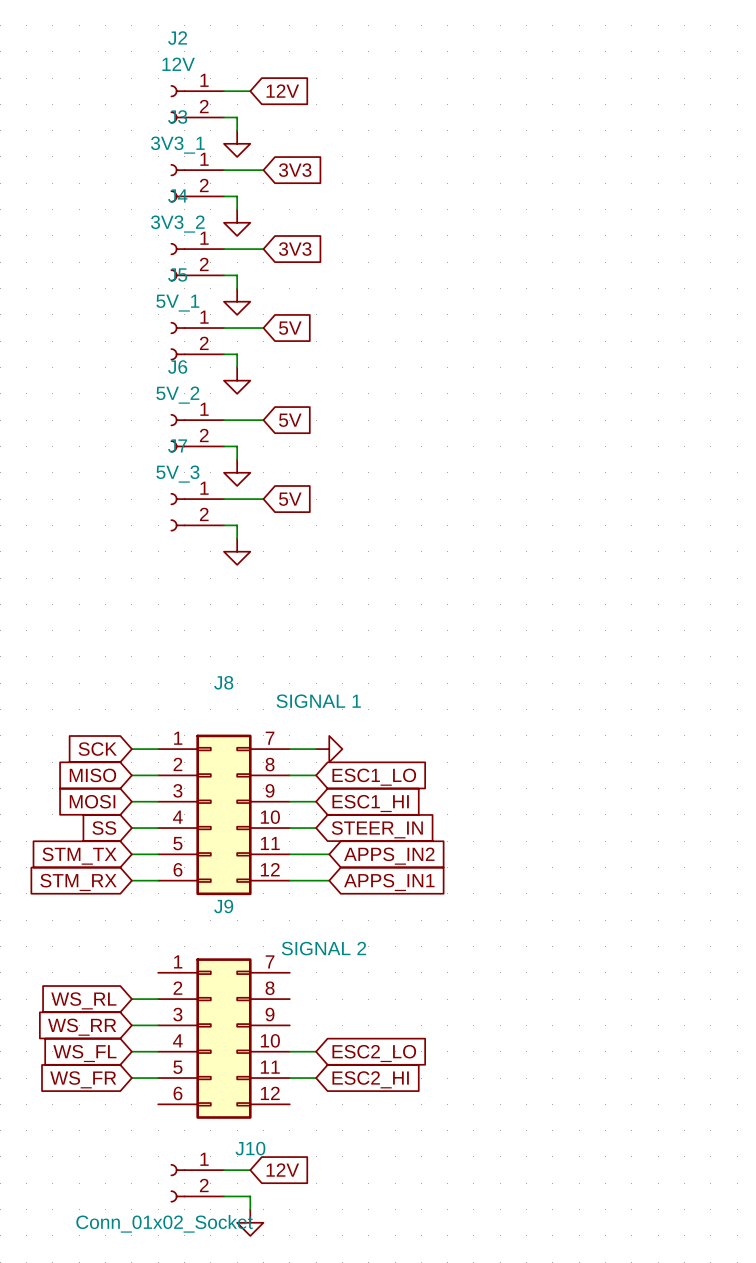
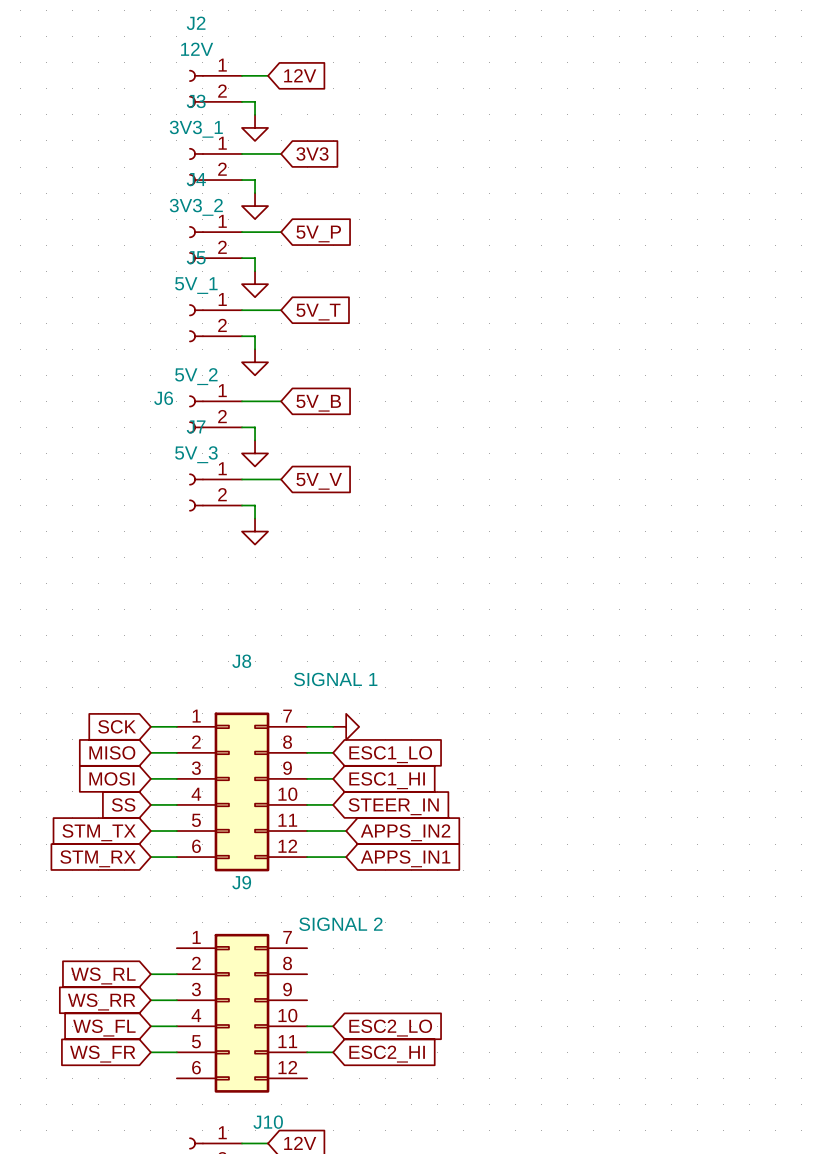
global label: 3V3 (295, 249) -> 5V_P (318, 233)
global label: 5V (290, 328) -> 5V_T (318, 312)
J6 name position: J6 (177, 367) -> J6 (163, 398)
global label: 5V (290, 420) -> 5V_B (318, 403)
global label: 5V (290, 499) -> 5V_V (319, 481)

